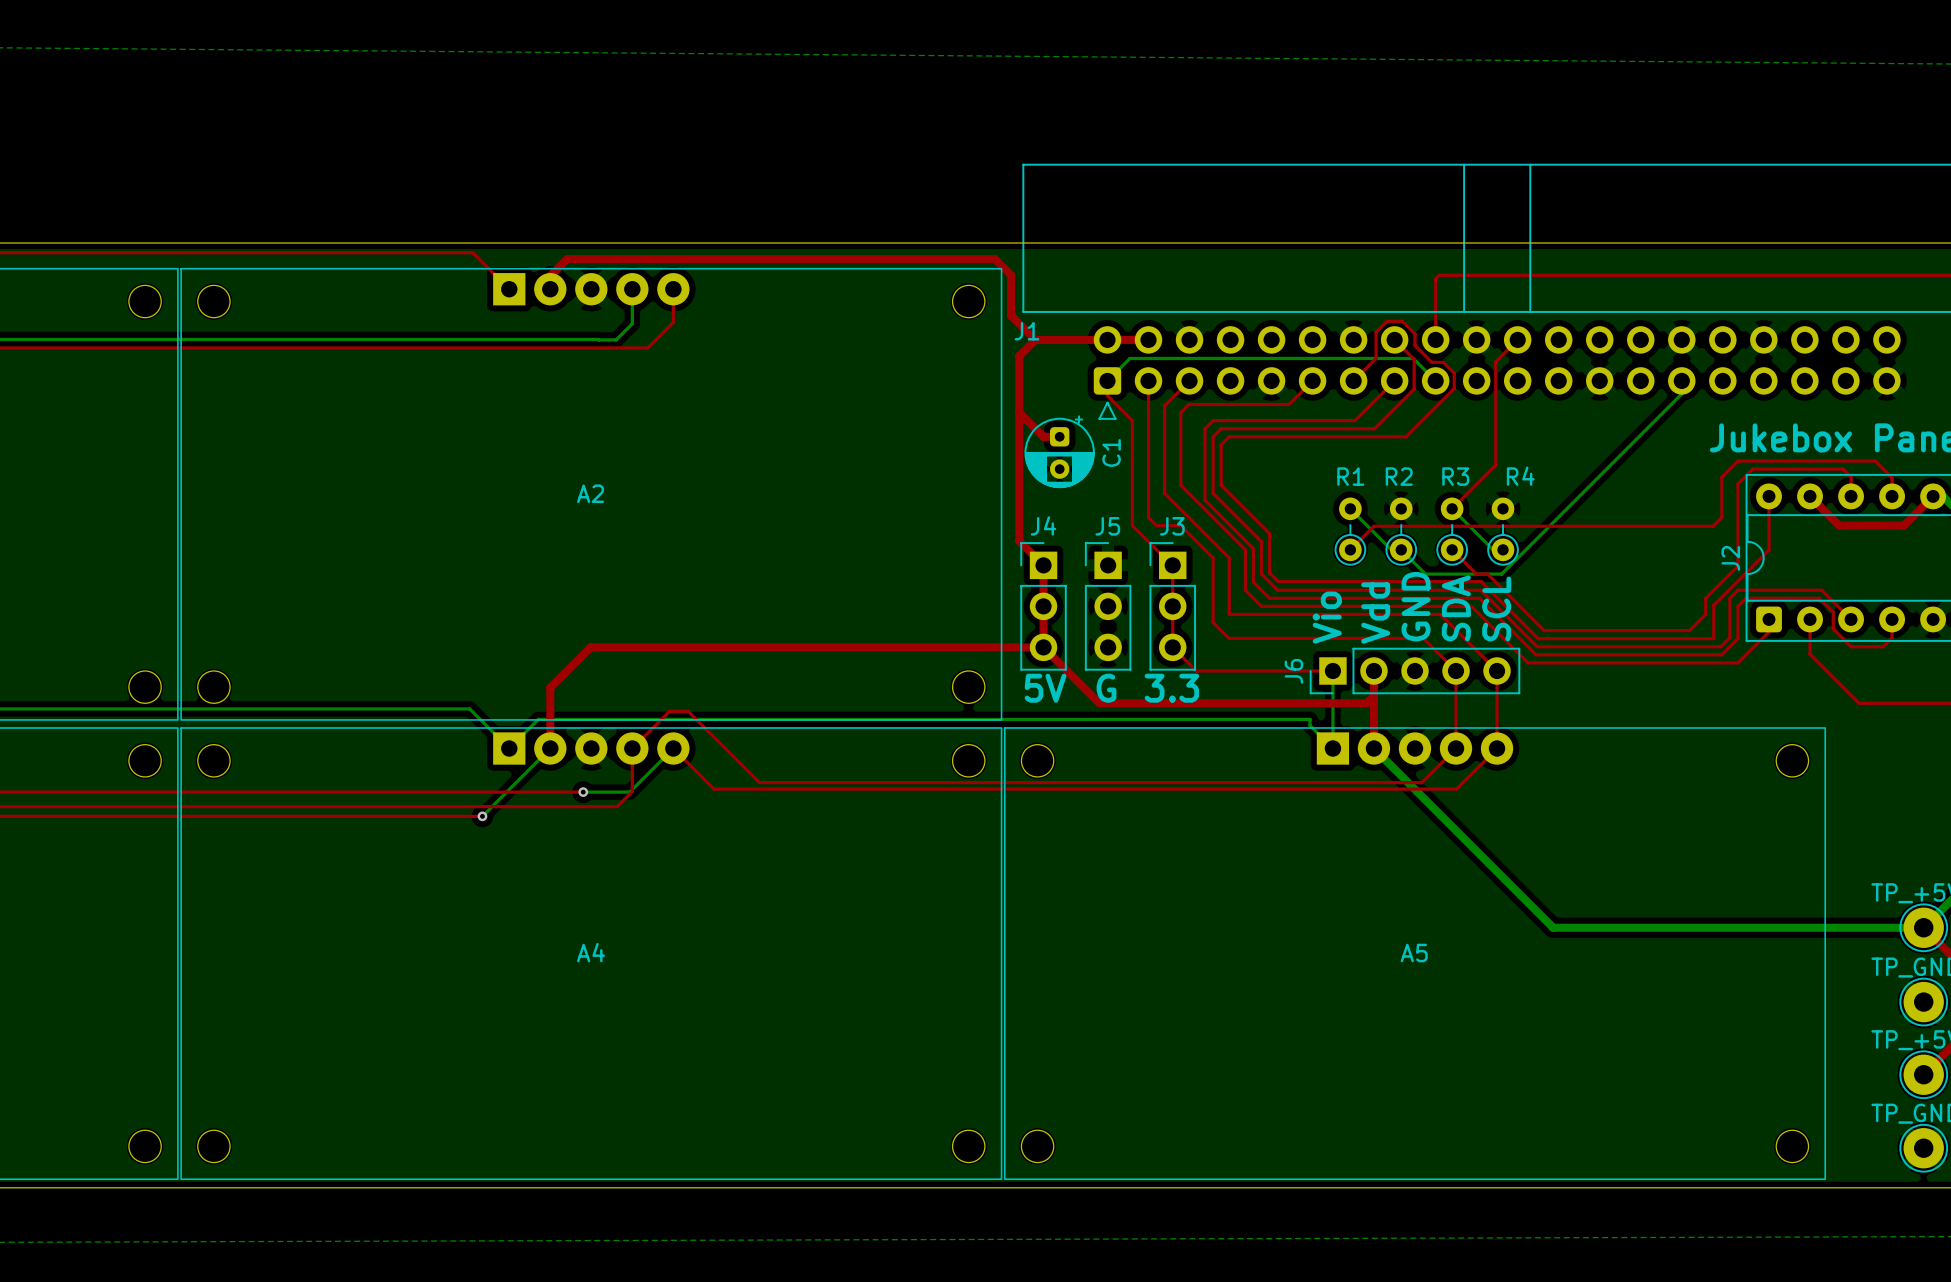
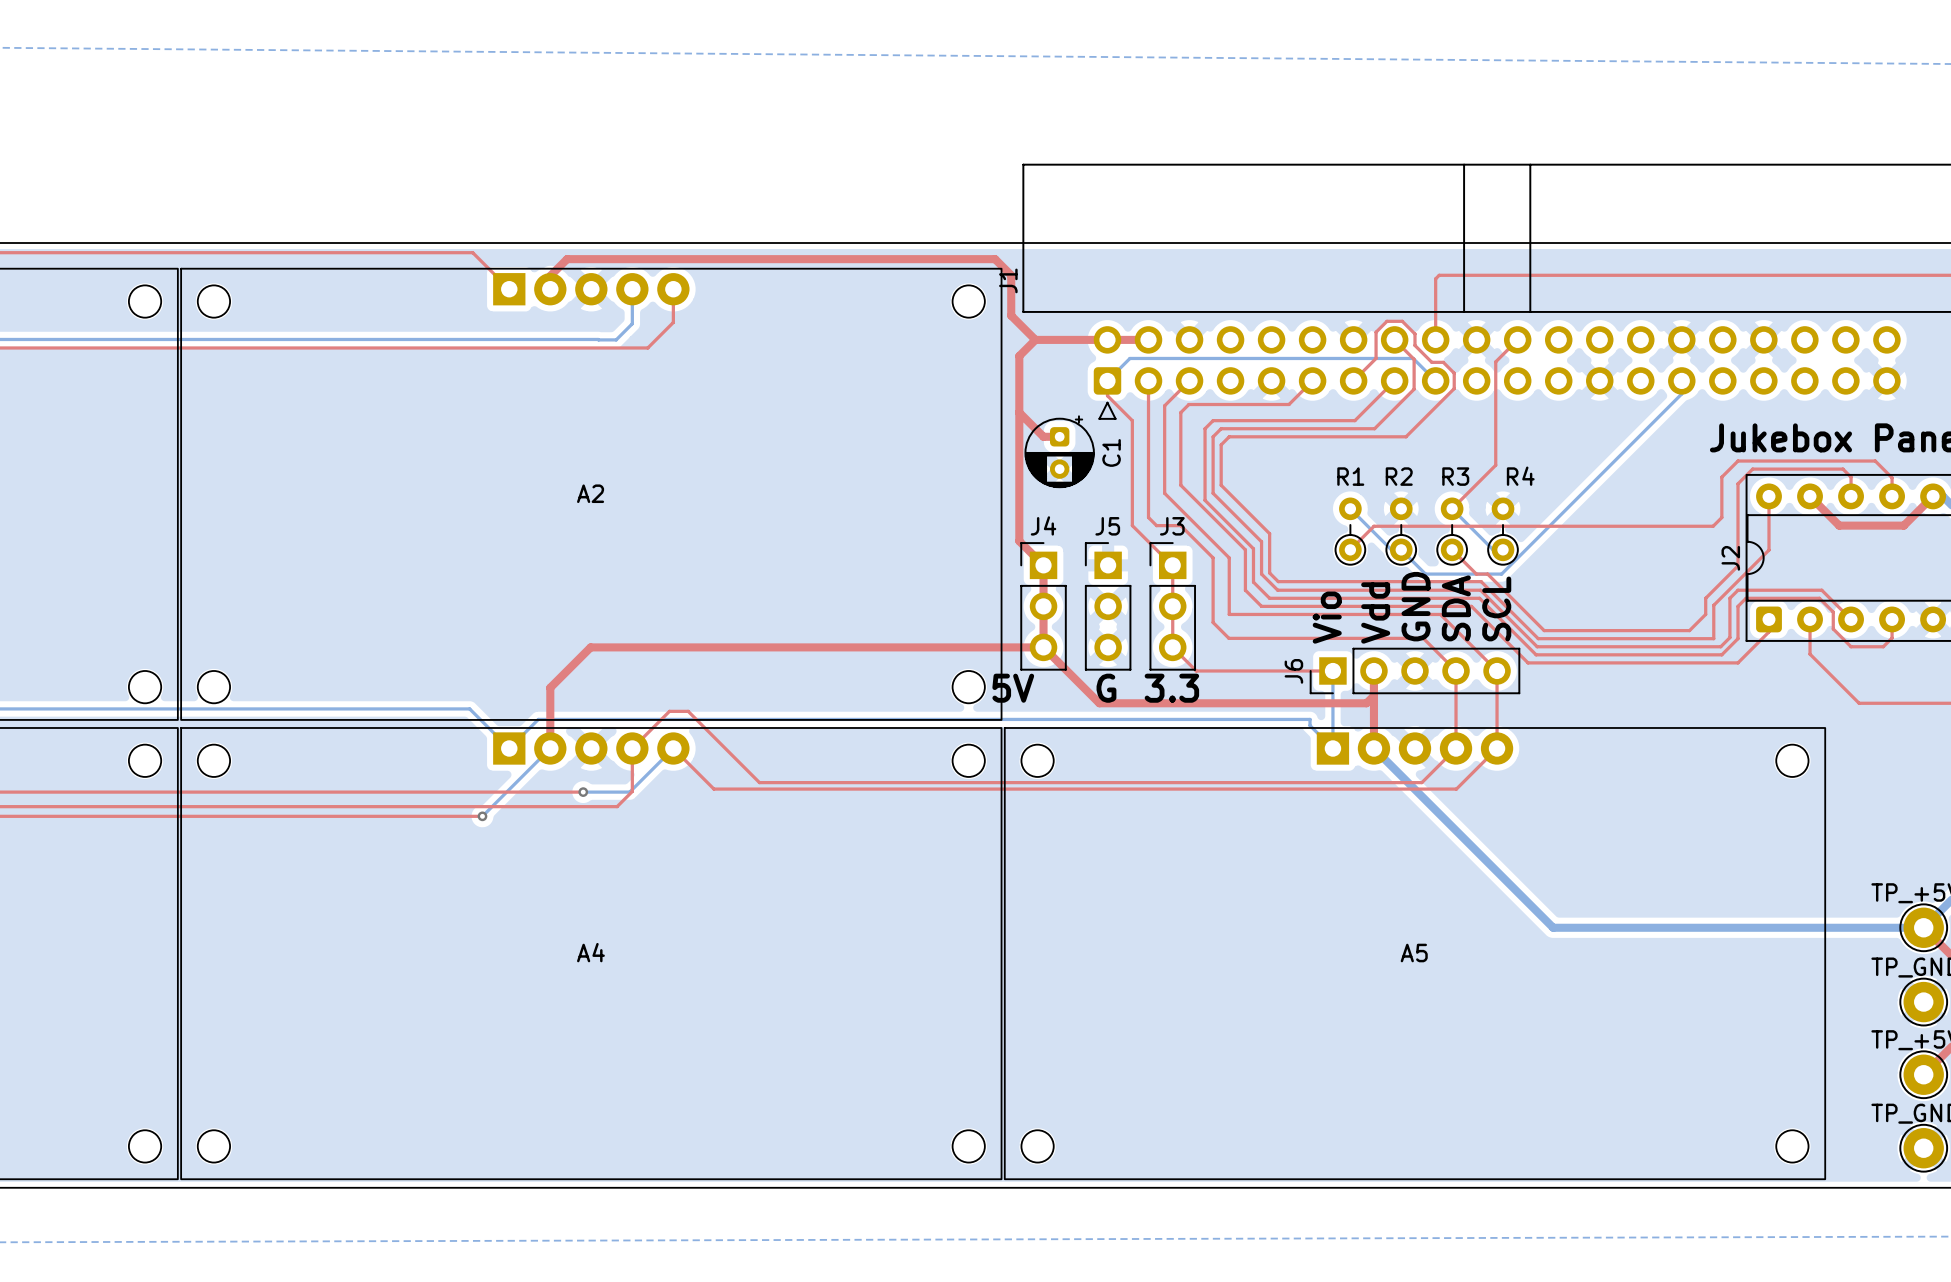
J1 name rotation: 0° (1027, 331) -> 90° counterclockwise (1008, 280)
J1 name position: J1 (1027, 331) -> J1 (1008, 280)
text position: 5V (1045, 688) -> 5V (1013, 688)

